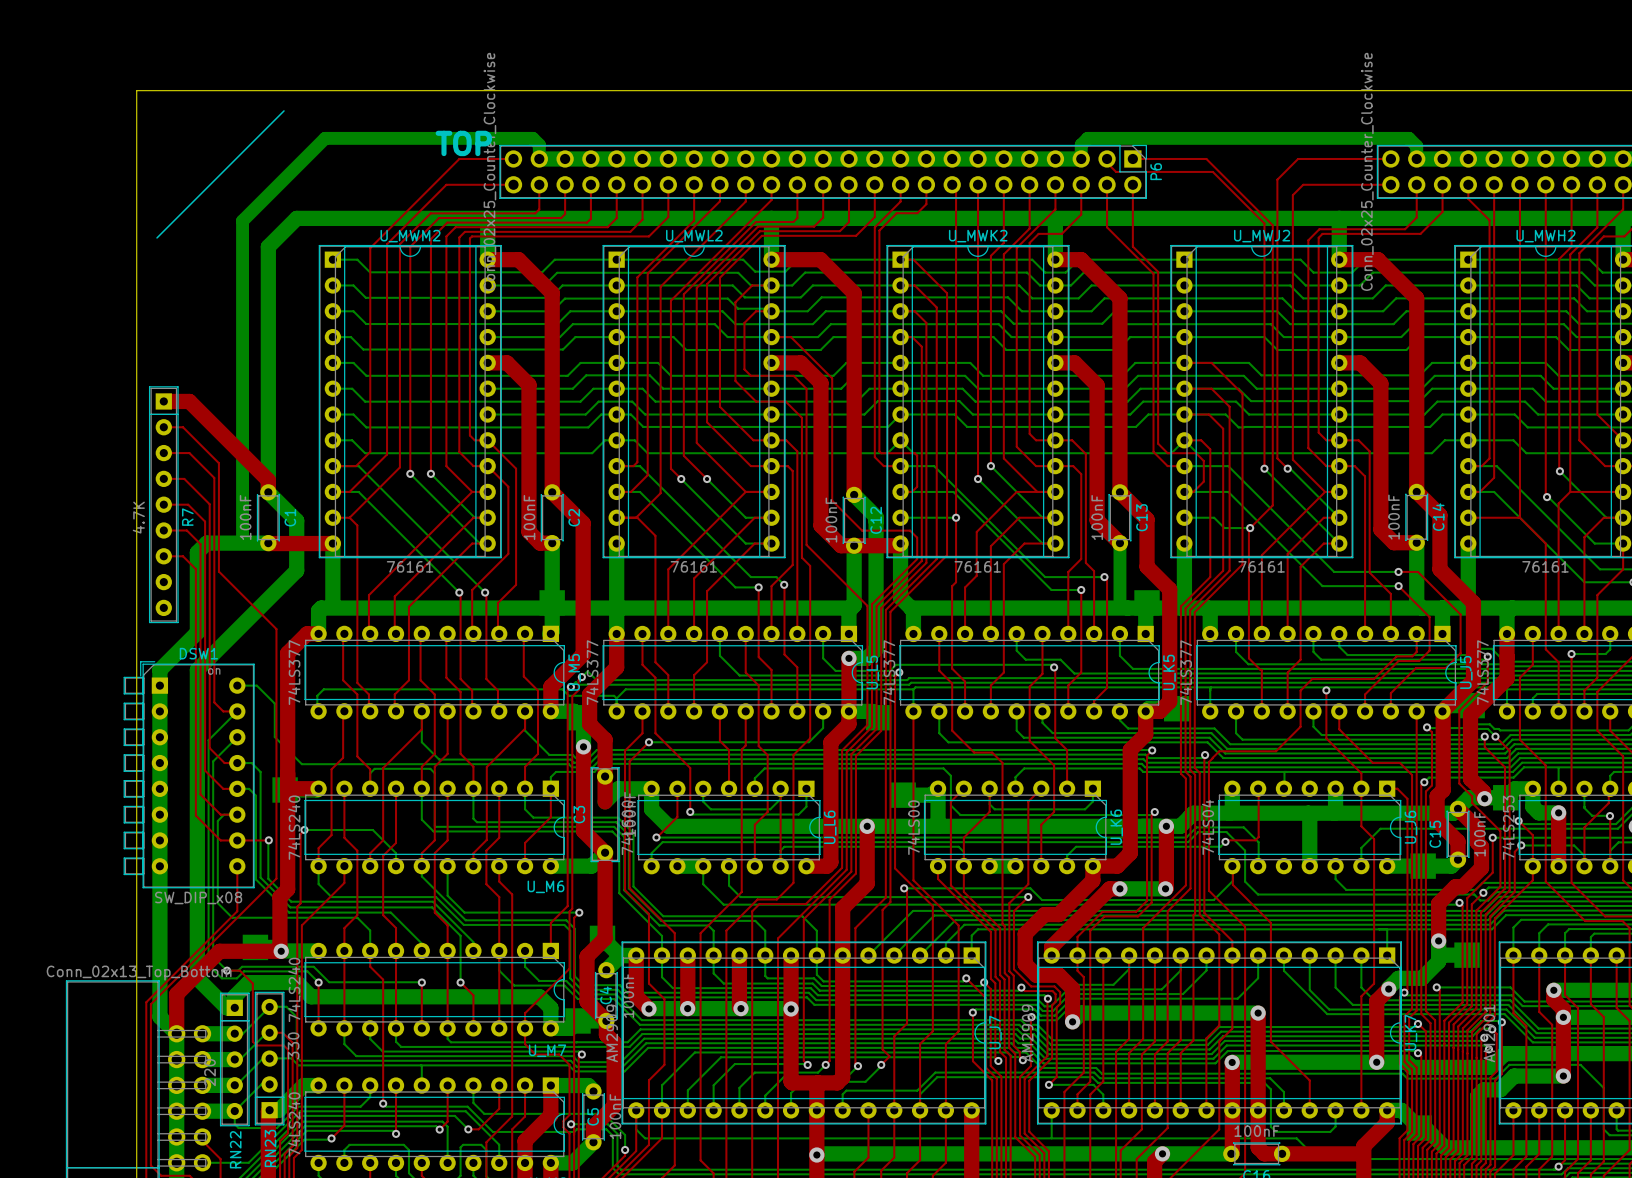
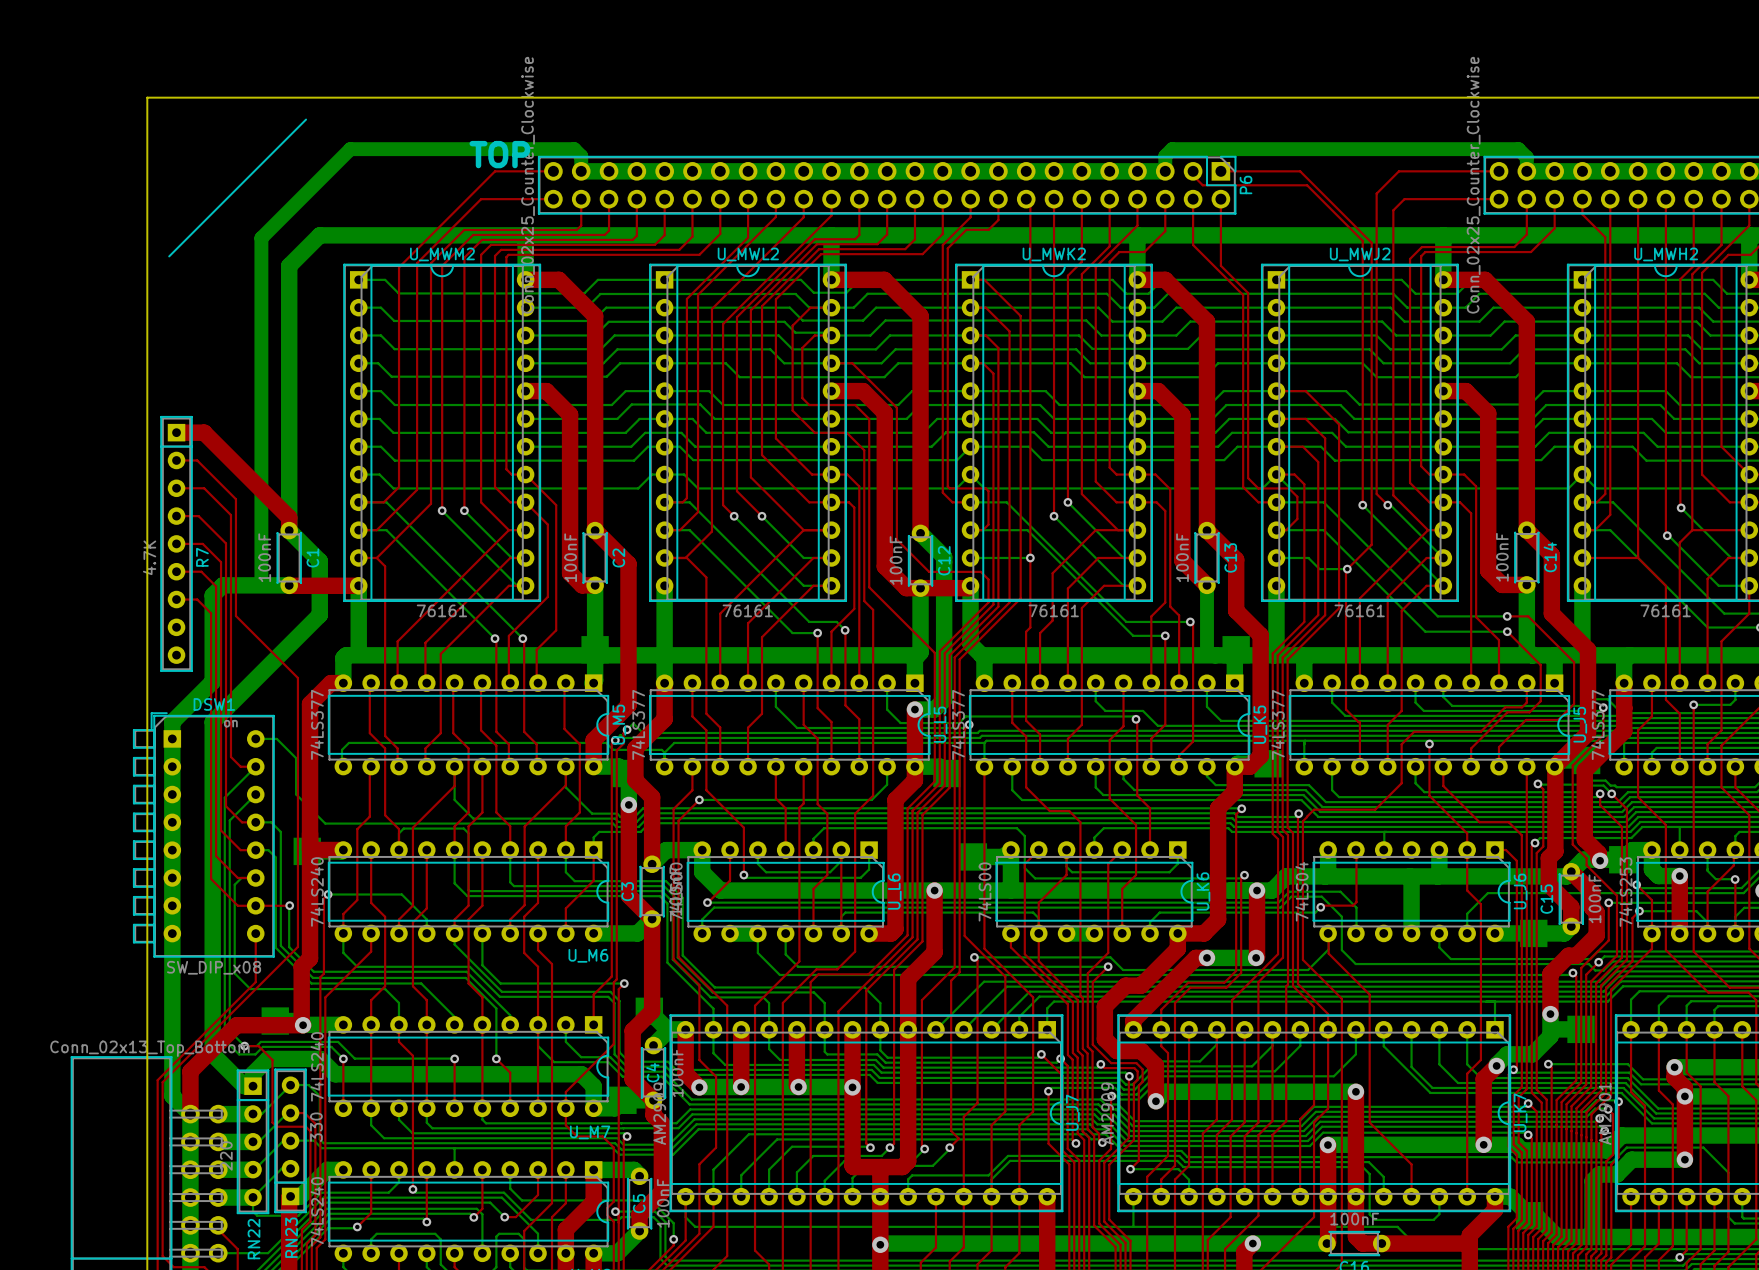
bottom track: none -> (1582, 474) (1568, 488) (1543, 488)
bottom track: (1431, 453) (1444, 440) (1513, 440) (1526, 453) -> (1582, 474) (1596, 488) (1645, 488)
C3 footprint: [590, 767, 620, 863] -> [639, 855, 665, 928]

